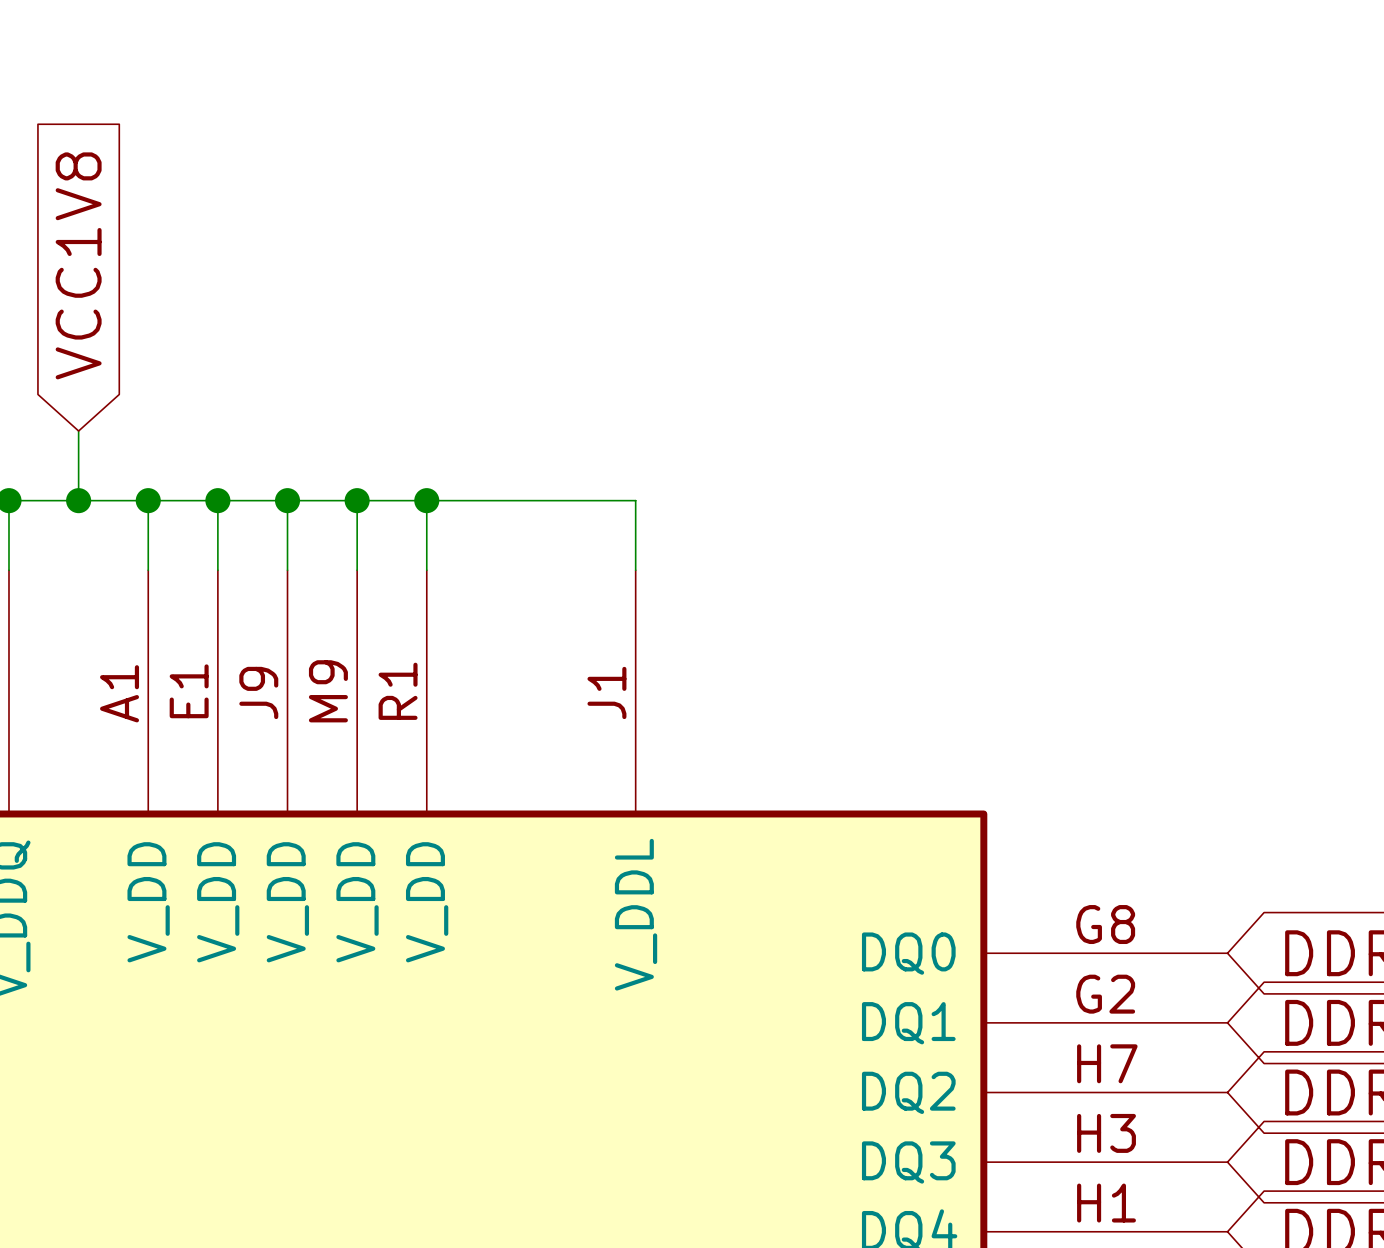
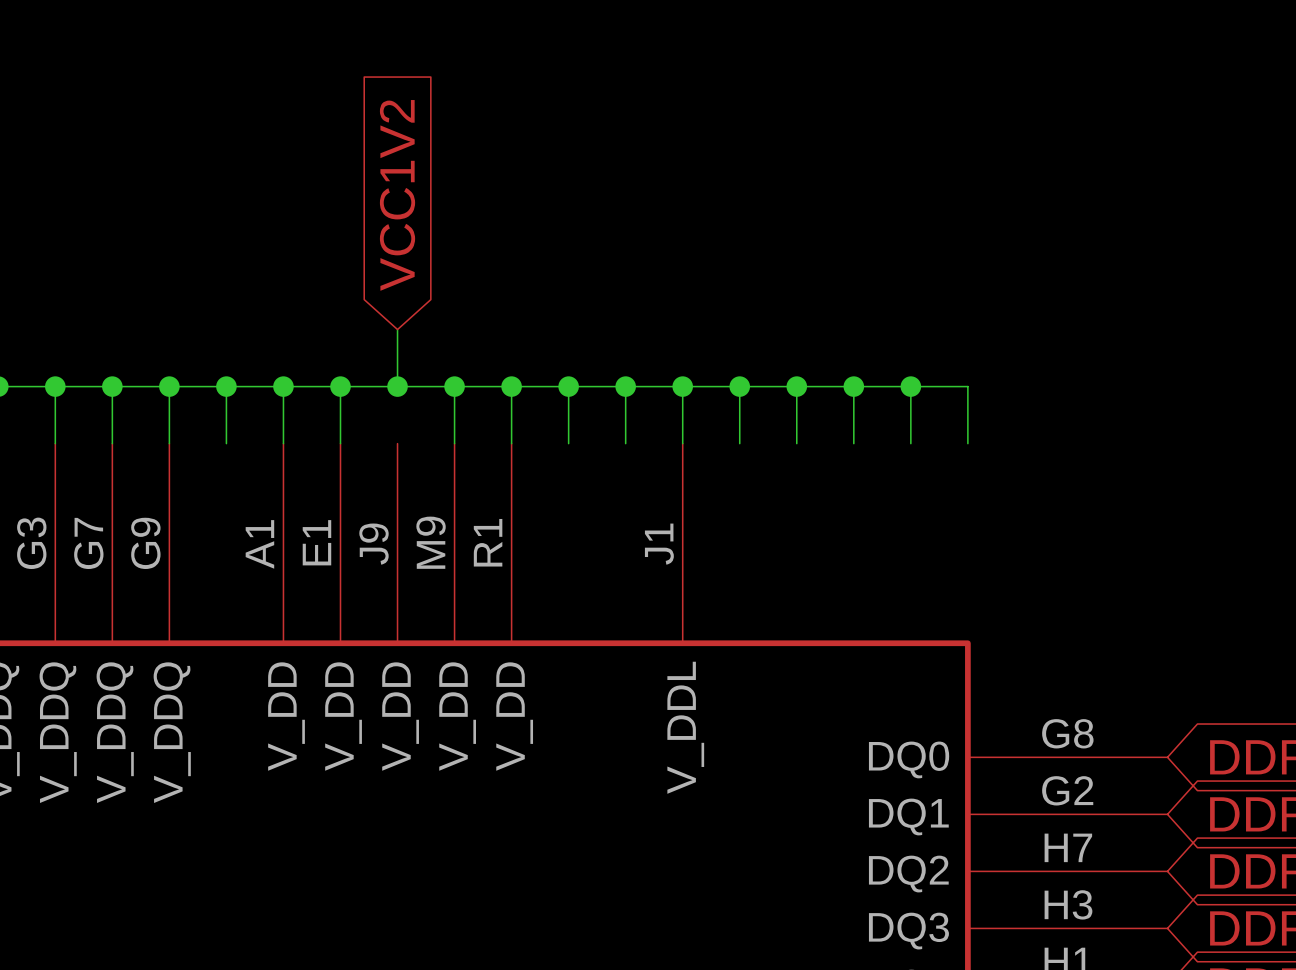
global label: VCC1V8 (78, 265) -> none
global label: none -> VCC1V2 (397, 195)
wire: (78, 431) (78, 500) -> (226, 443) (226, 386)
wire: (287, 500) (287, 570) -> (397, 386) (397, 329)
wire: none -> (568, 386) (568, 443)
junction: none -> (568, 386)
wire: none -> (625, 386) (625, 443)
junction: none -> (625, 386)
wire: none -> (682, 386) (967, 386) (967, 443)
junction: none -> (682, 386)
wire: none -> (739, 386) (739, 443)
junction: none -> (739, 386)
wire: none -> (796, 386) (796, 443)
junction: none -> (796, 386)
wire: none -> (853, 386) (853, 443)
junction: none -> (853, 386)
wire: none -> (910, 386) (910, 443)
junction: none -> (910, 386)

